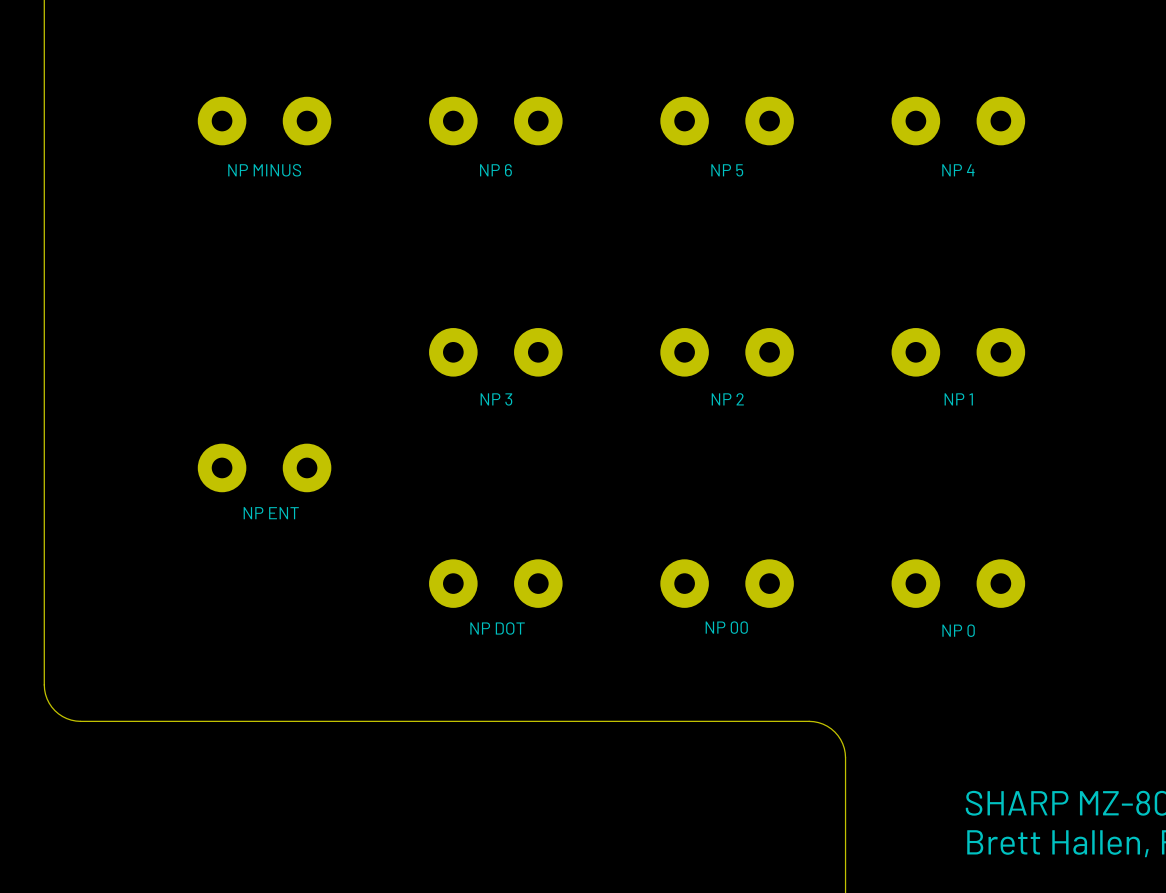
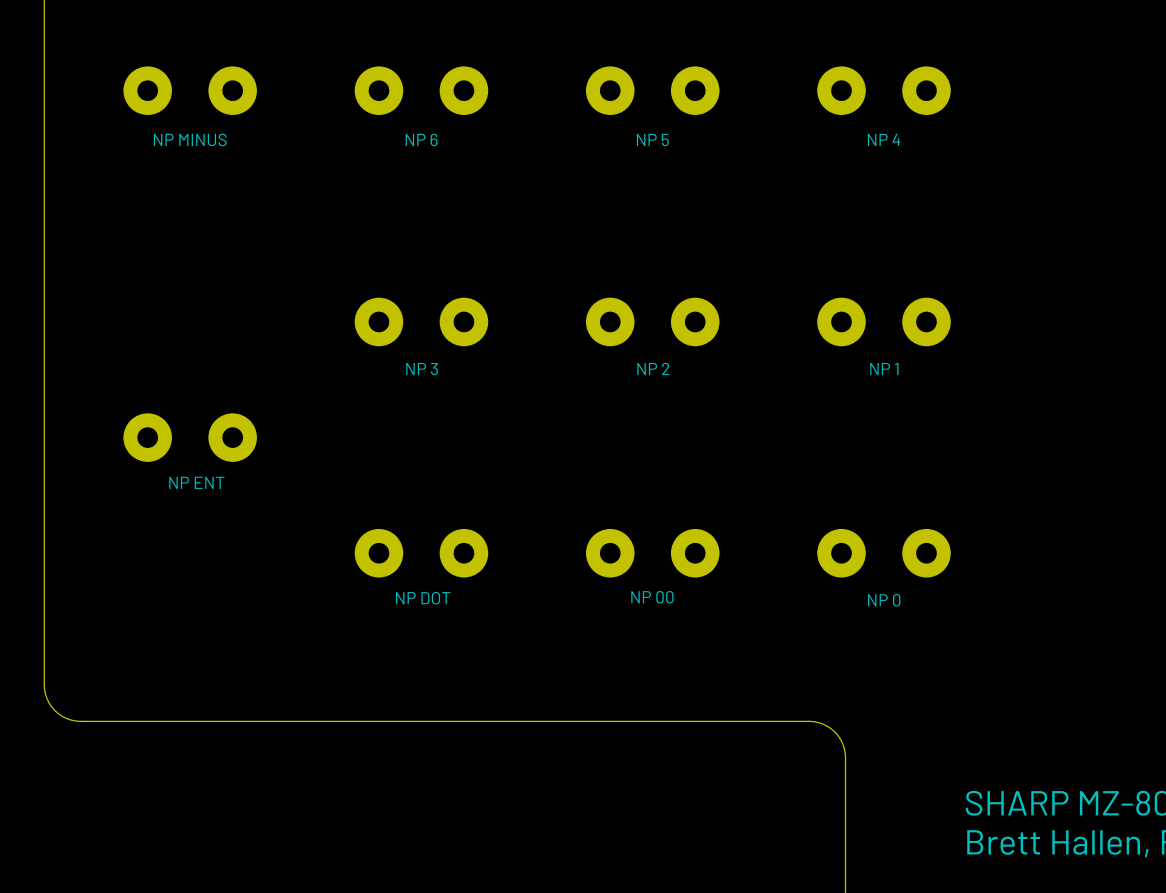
part position: (264, 121) -> (190, 90)
part position: (495, 121) -> (421, 90)
part position: (727, 121) -> (652, 90)
part position: (958, 121) -> (884, 90)
part position: (495, 352) -> (421, 321)
part position: (727, 352) -> (652, 321)
part position: (958, 352) -> (884, 321)
part position: (264, 467) -> (190, 437)
part position: (495, 583) -> (421, 553)
part position: (727, 583) -> (652, 553)
part position: (958, 583) -> (884, 553)

